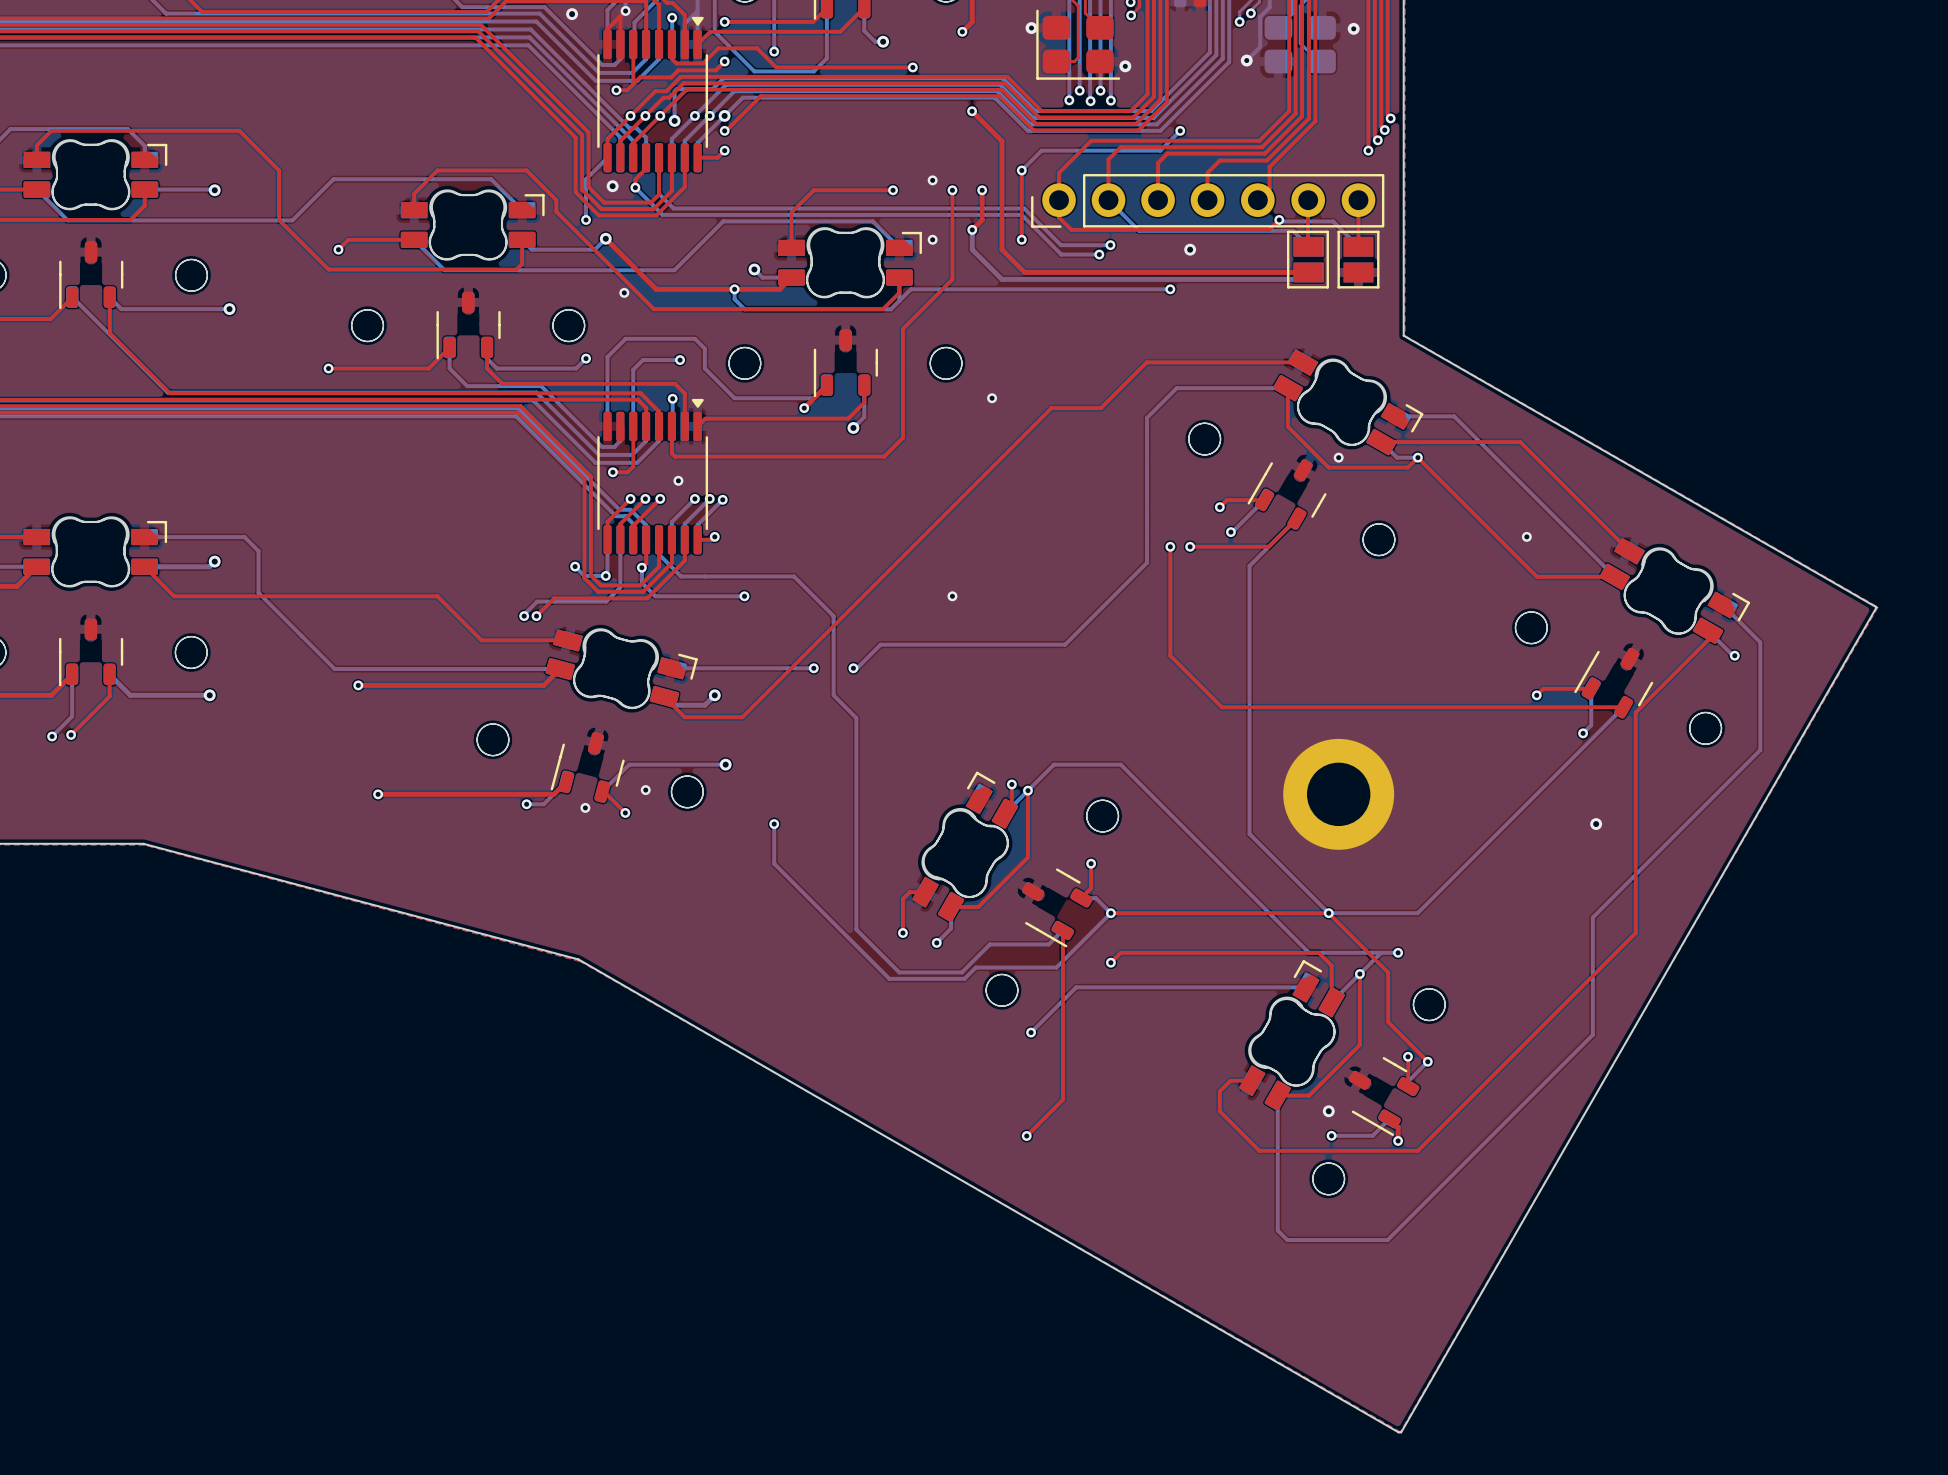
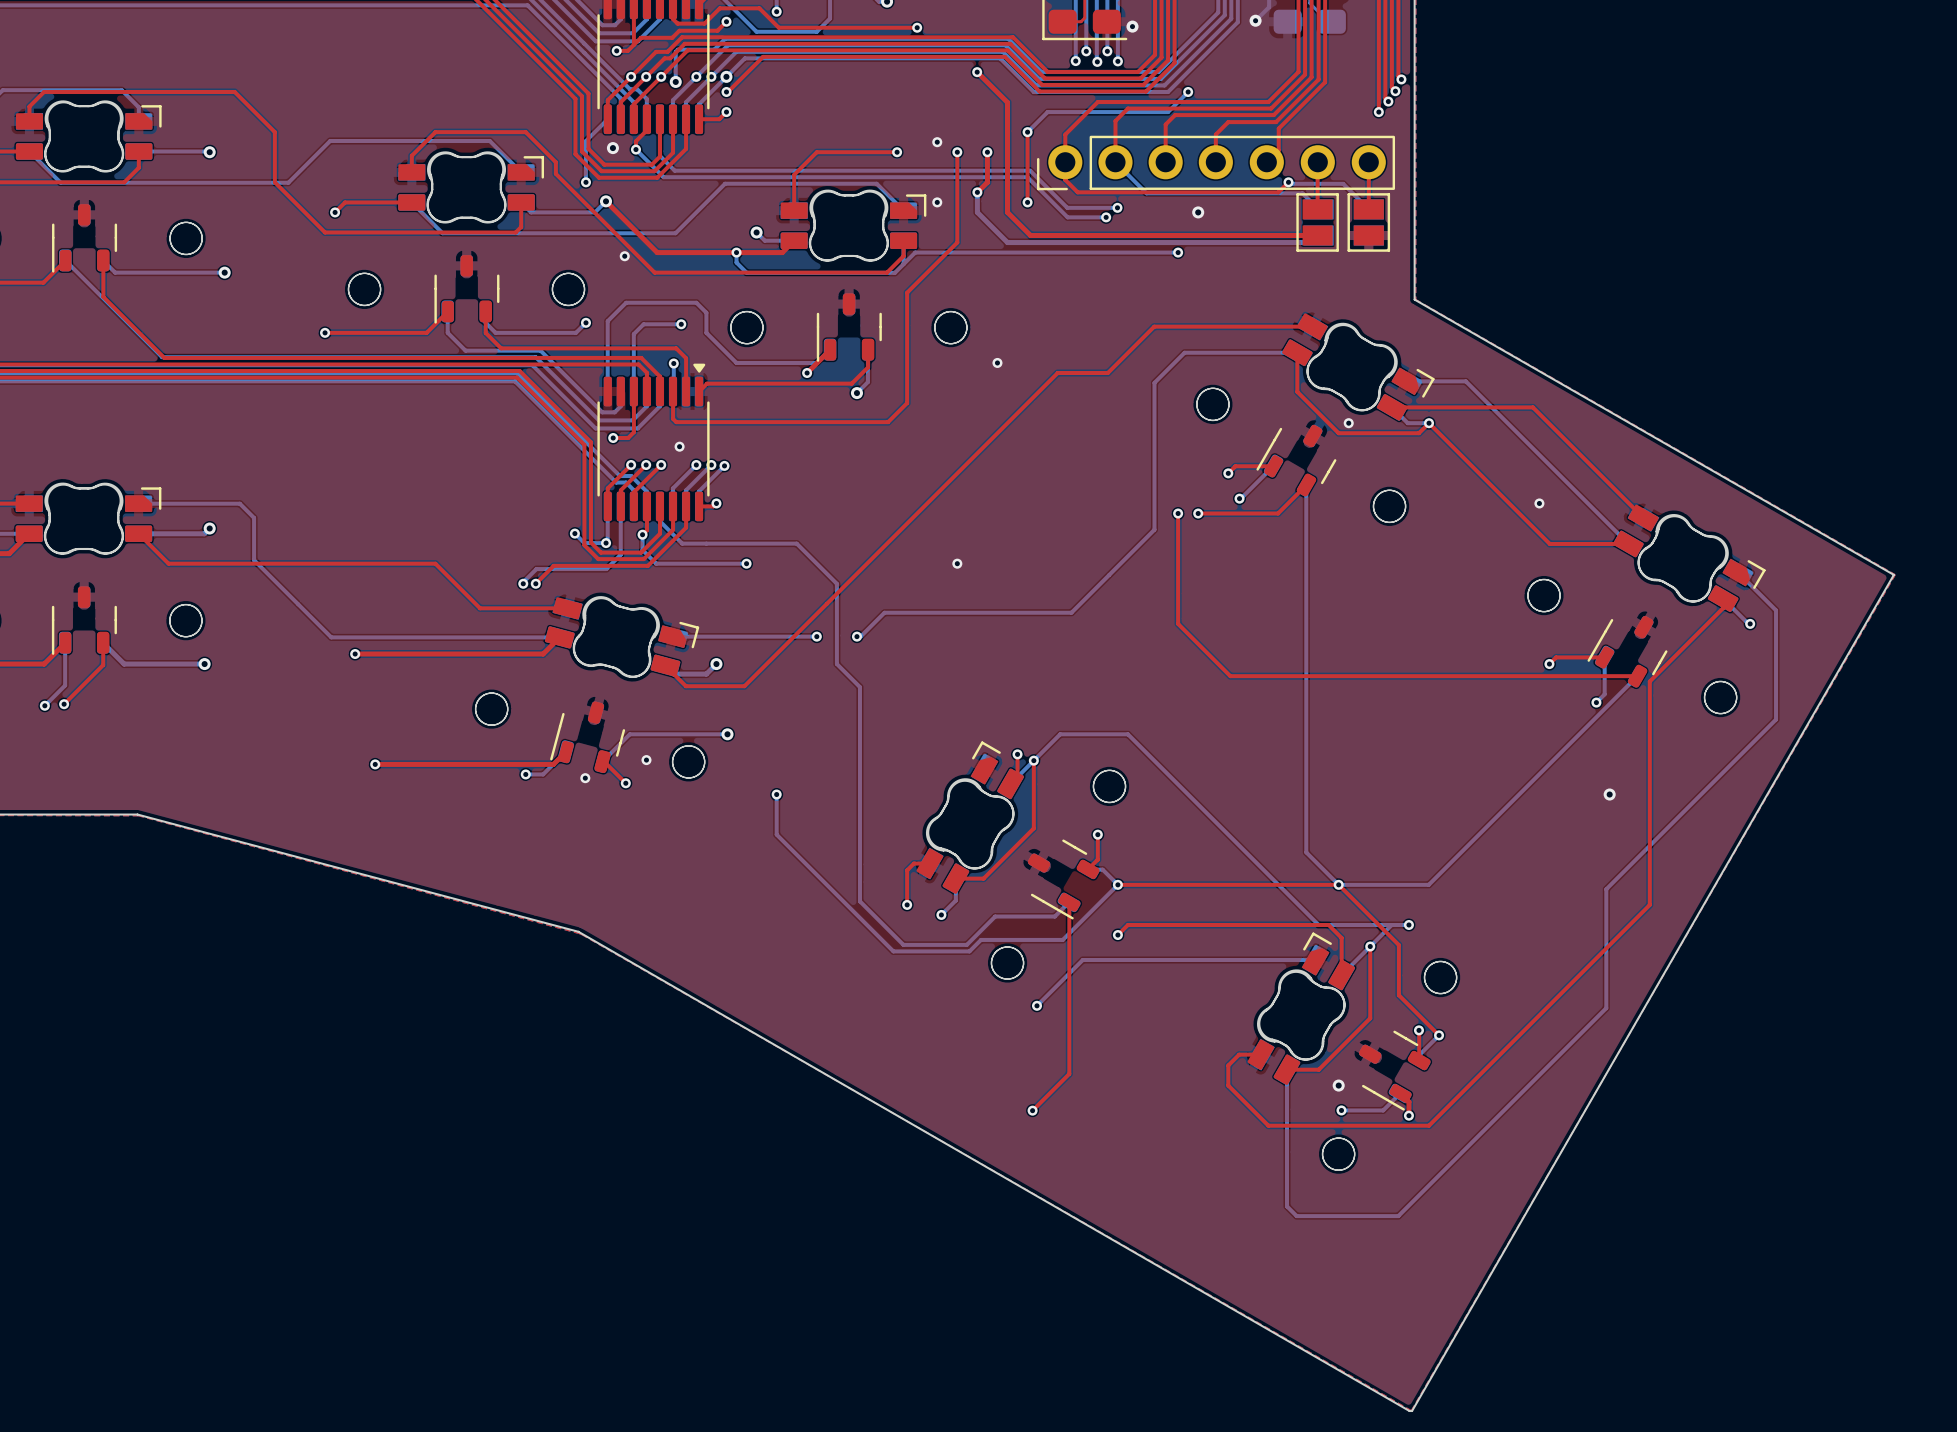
bottom track: (1296, 518) (1249, 565) (1249, 833) (1296, 881) -> (1306, 485) (1306, 852)
part: (1338, 794) -> none

